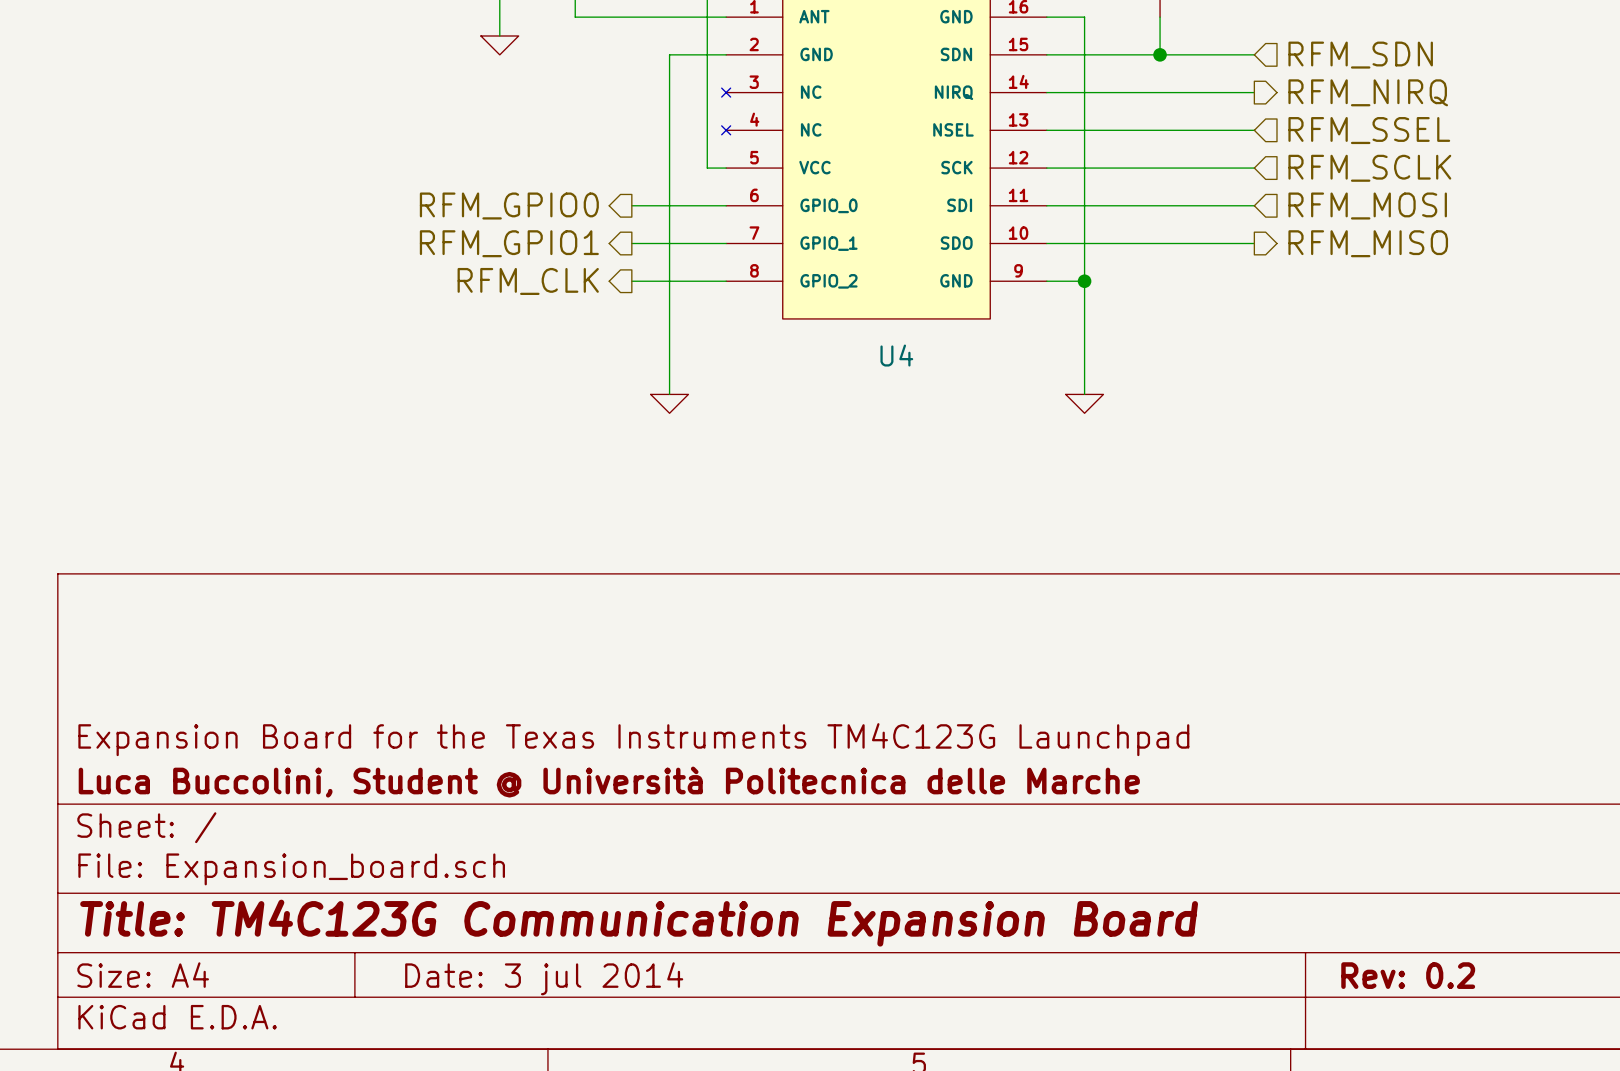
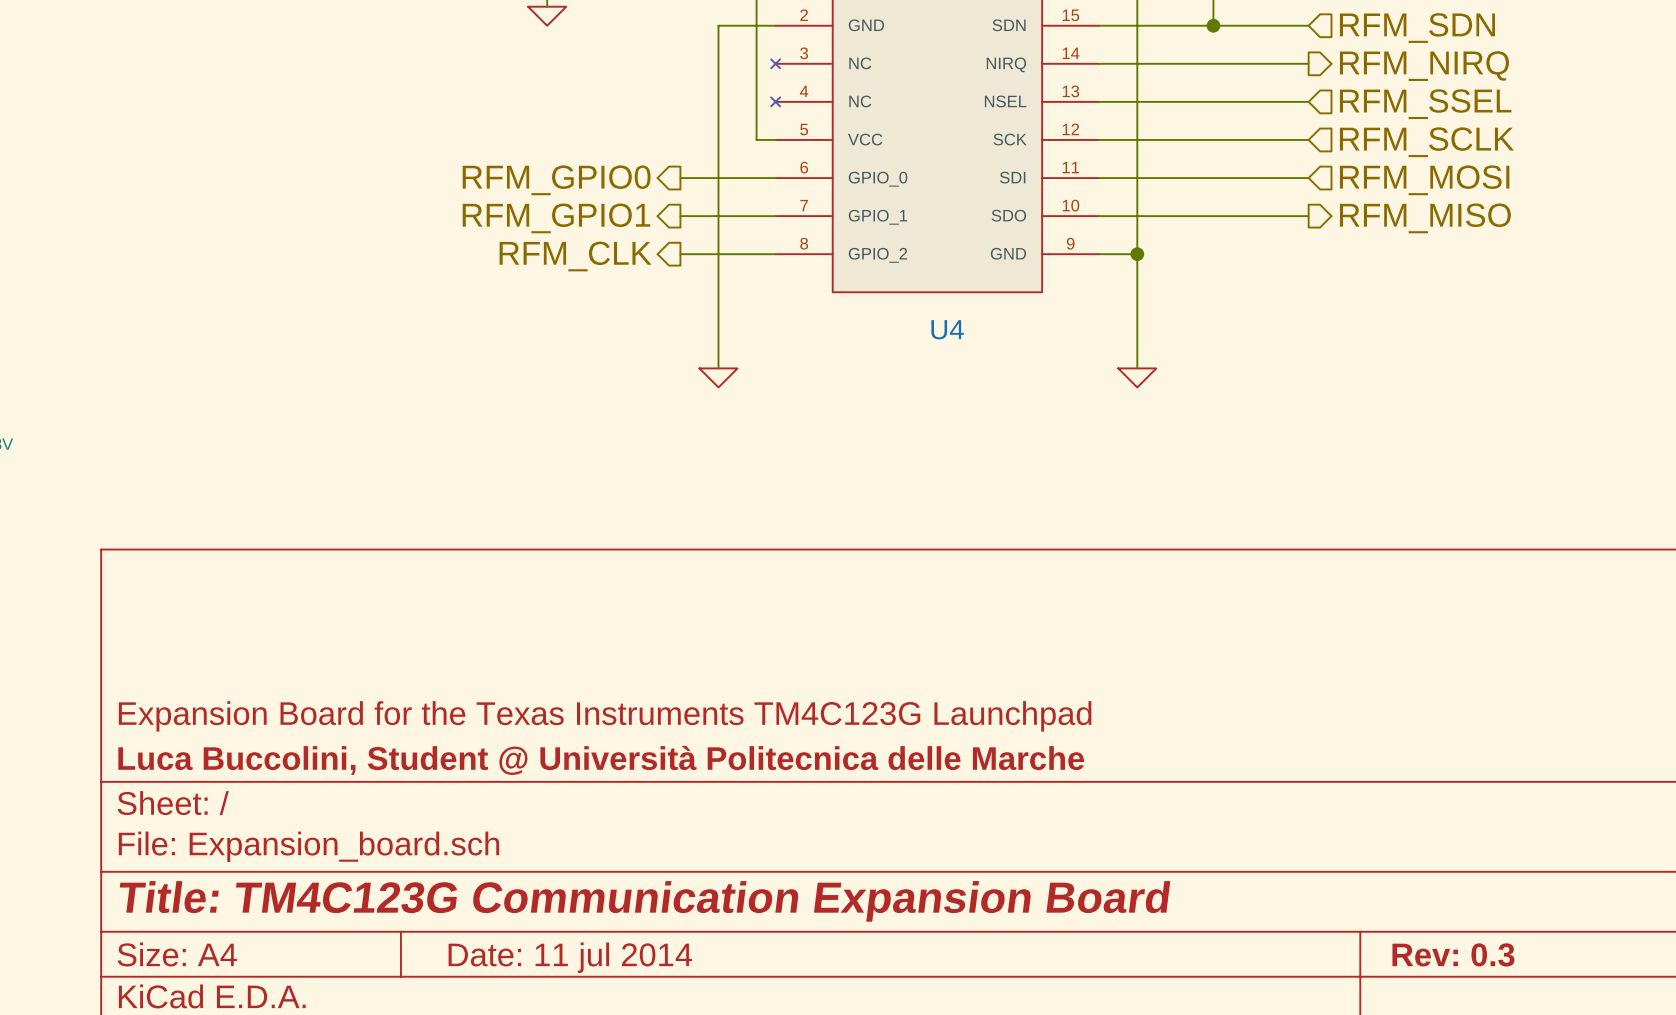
title block: Rev: 0.2 (1408, 975) -> Rev: 0.3 (1453, 954)
title block: Date: 3 jul 2014 (544, 978) -> Date: 11 jul 2014 (570, 957)

